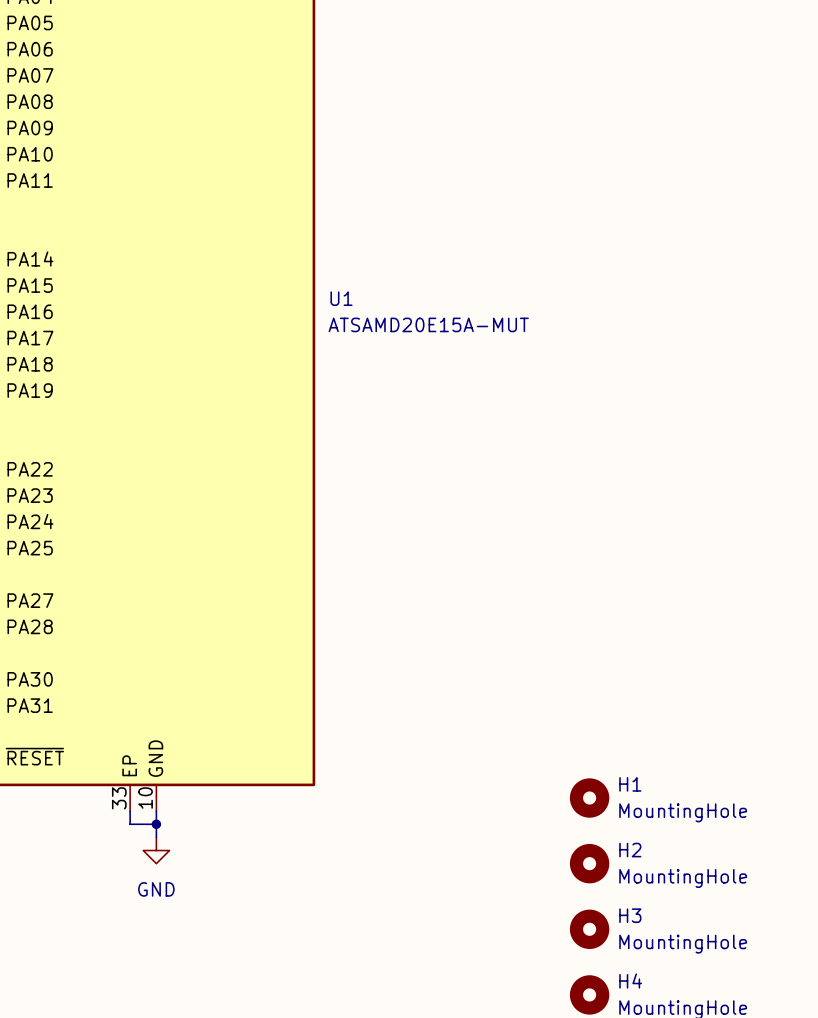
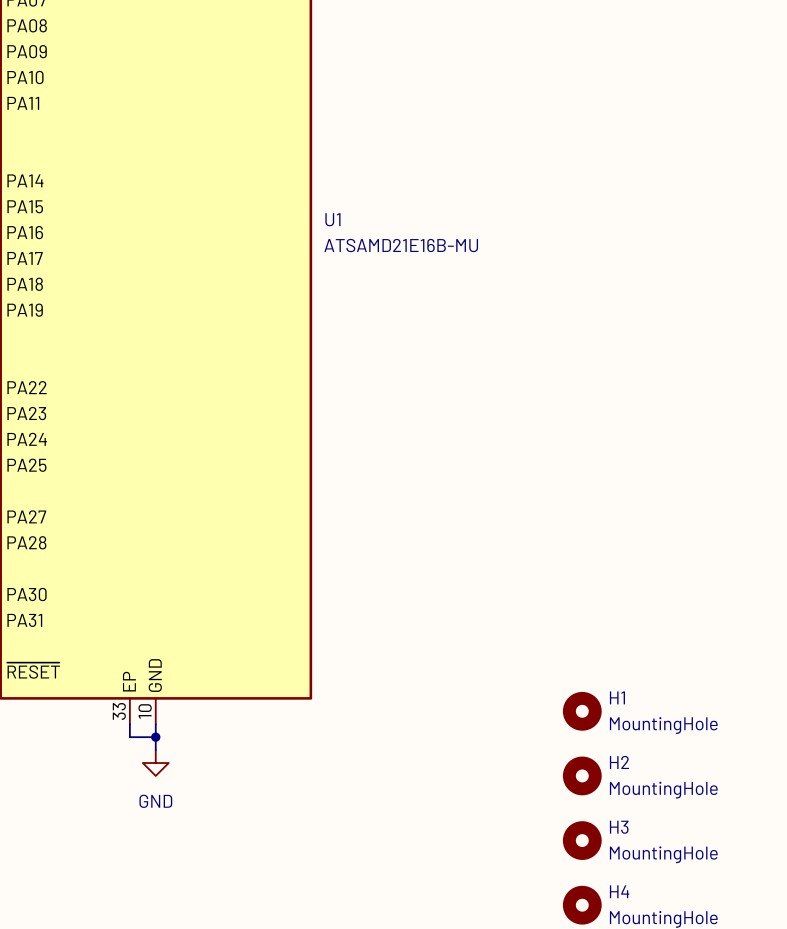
U1 value: ATSAMD20E15A-MUT (428, 324) -> ATSAMD21E16B-MU (401, 245)

